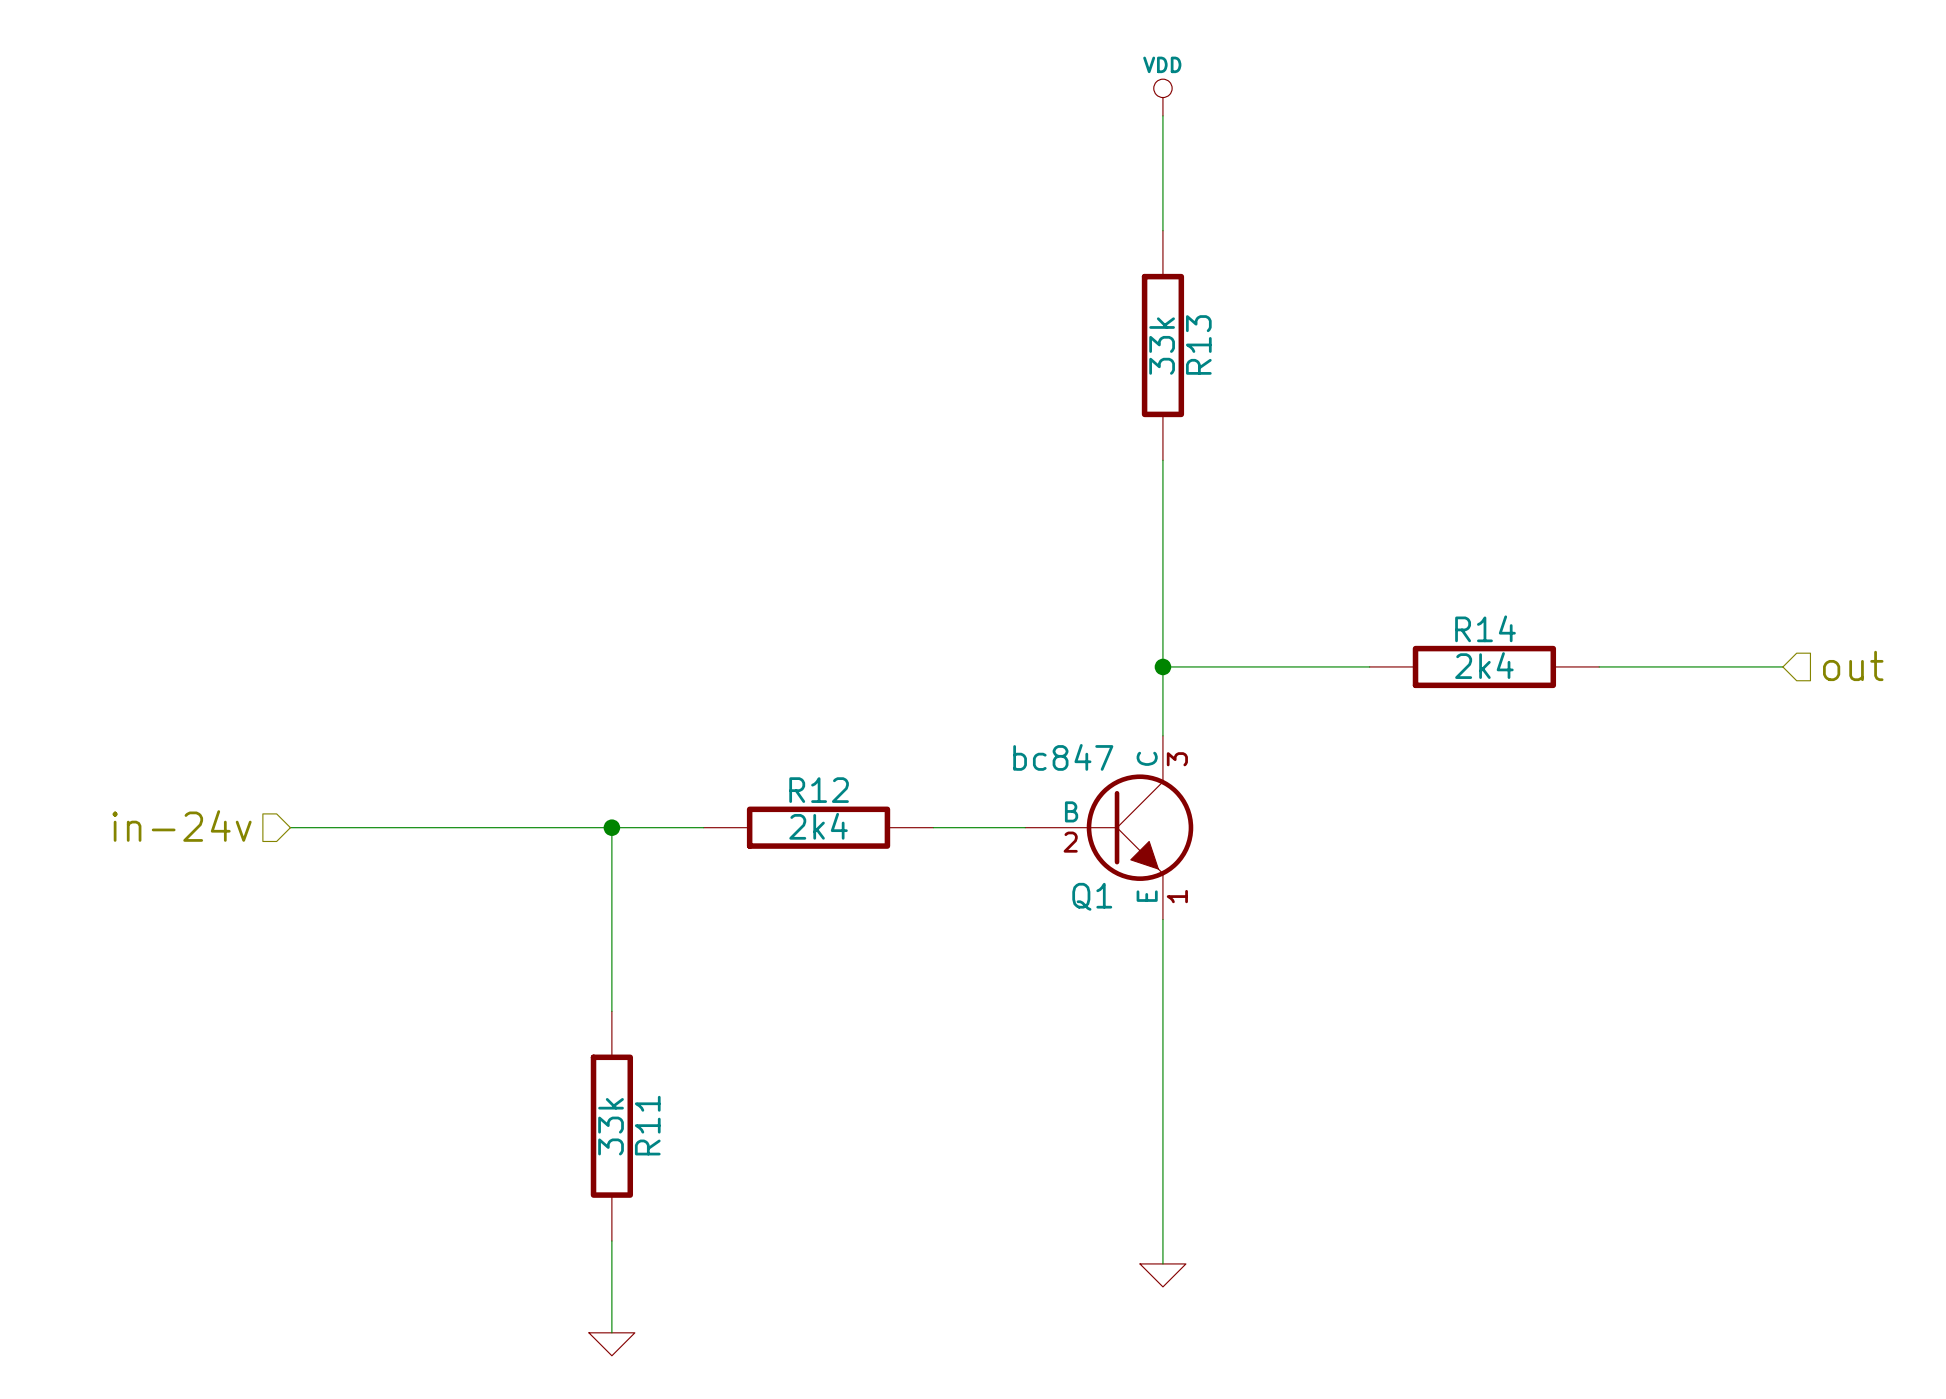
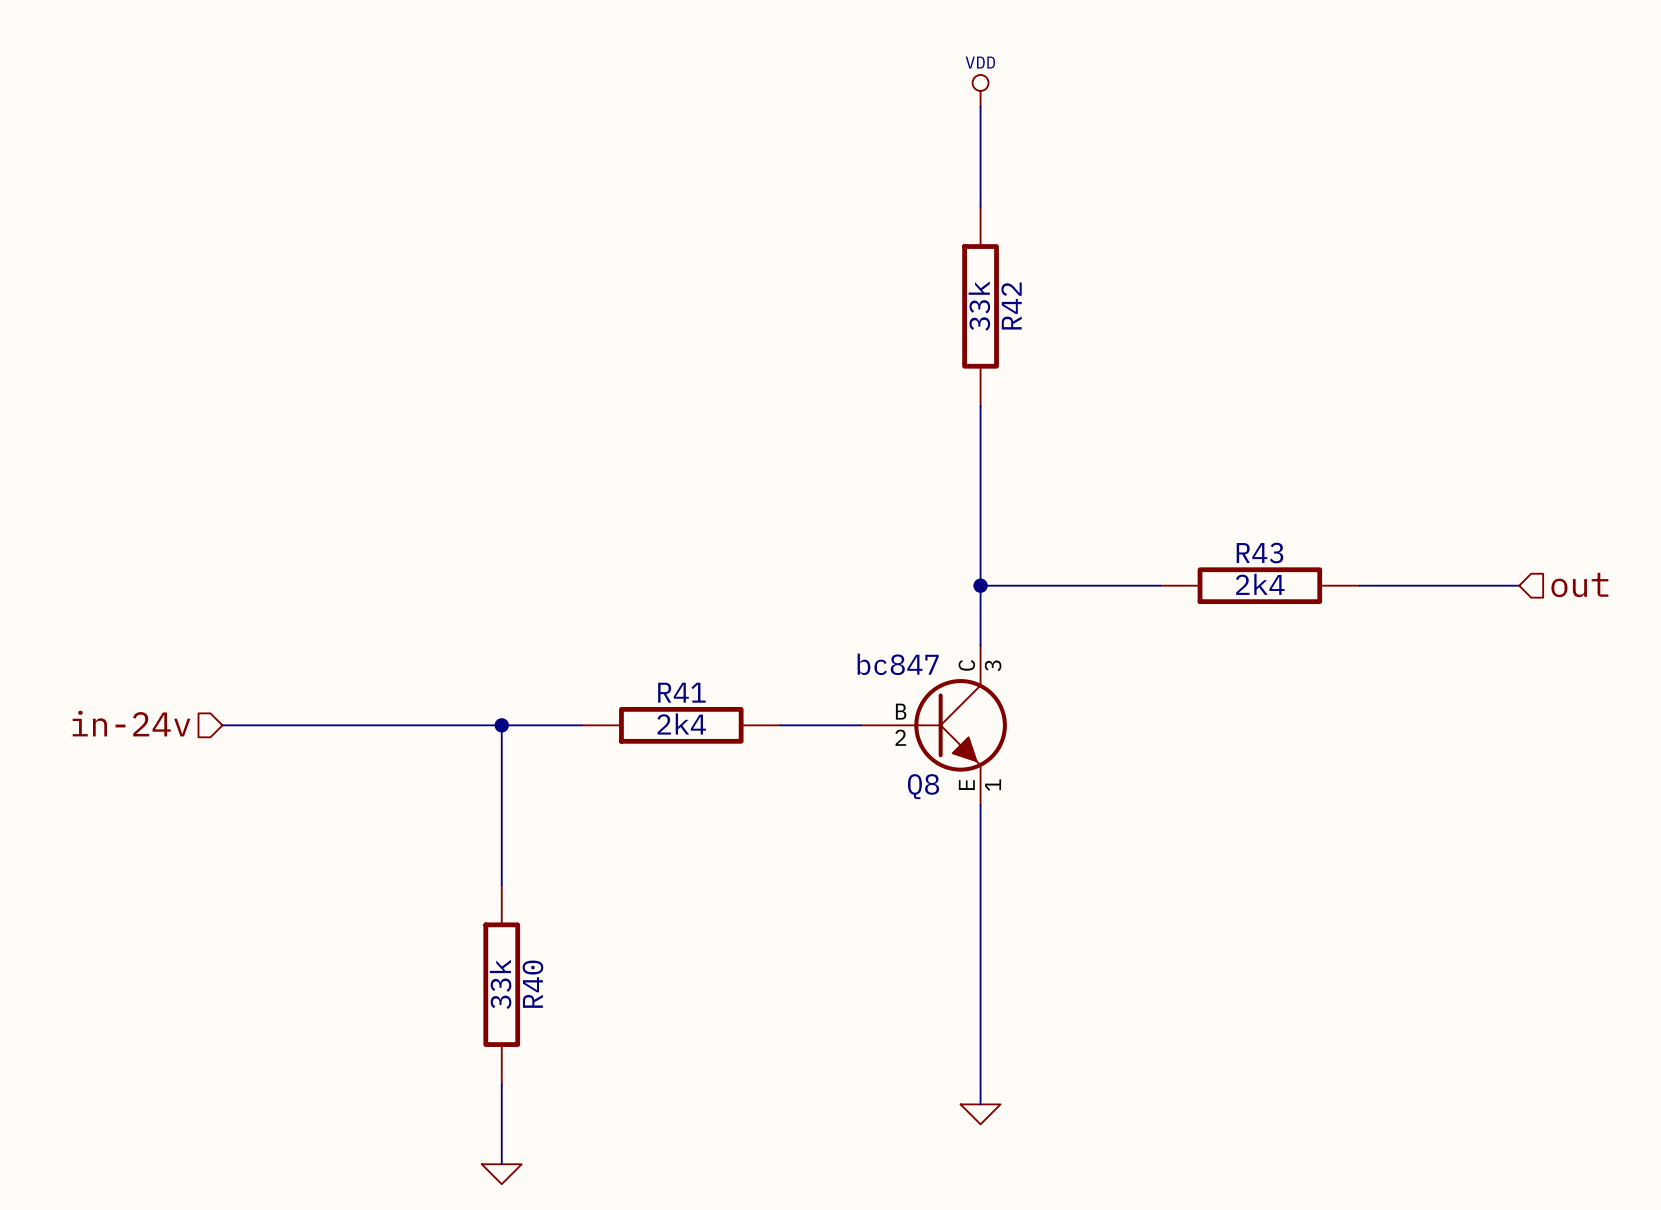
R13 name: R13 (1198, 344) -> R42 (1011, 306)
R14 name: R14 (1485, 628) -> R43 (1259, 553)
R12 name: R12 (819, 790) -> R41 (681, 692)
Q1 name: Q1 (1092, 896) -> Q8 (923, 786)
R11 name: R11 (647, 1125) -> R40 (532, 984)

